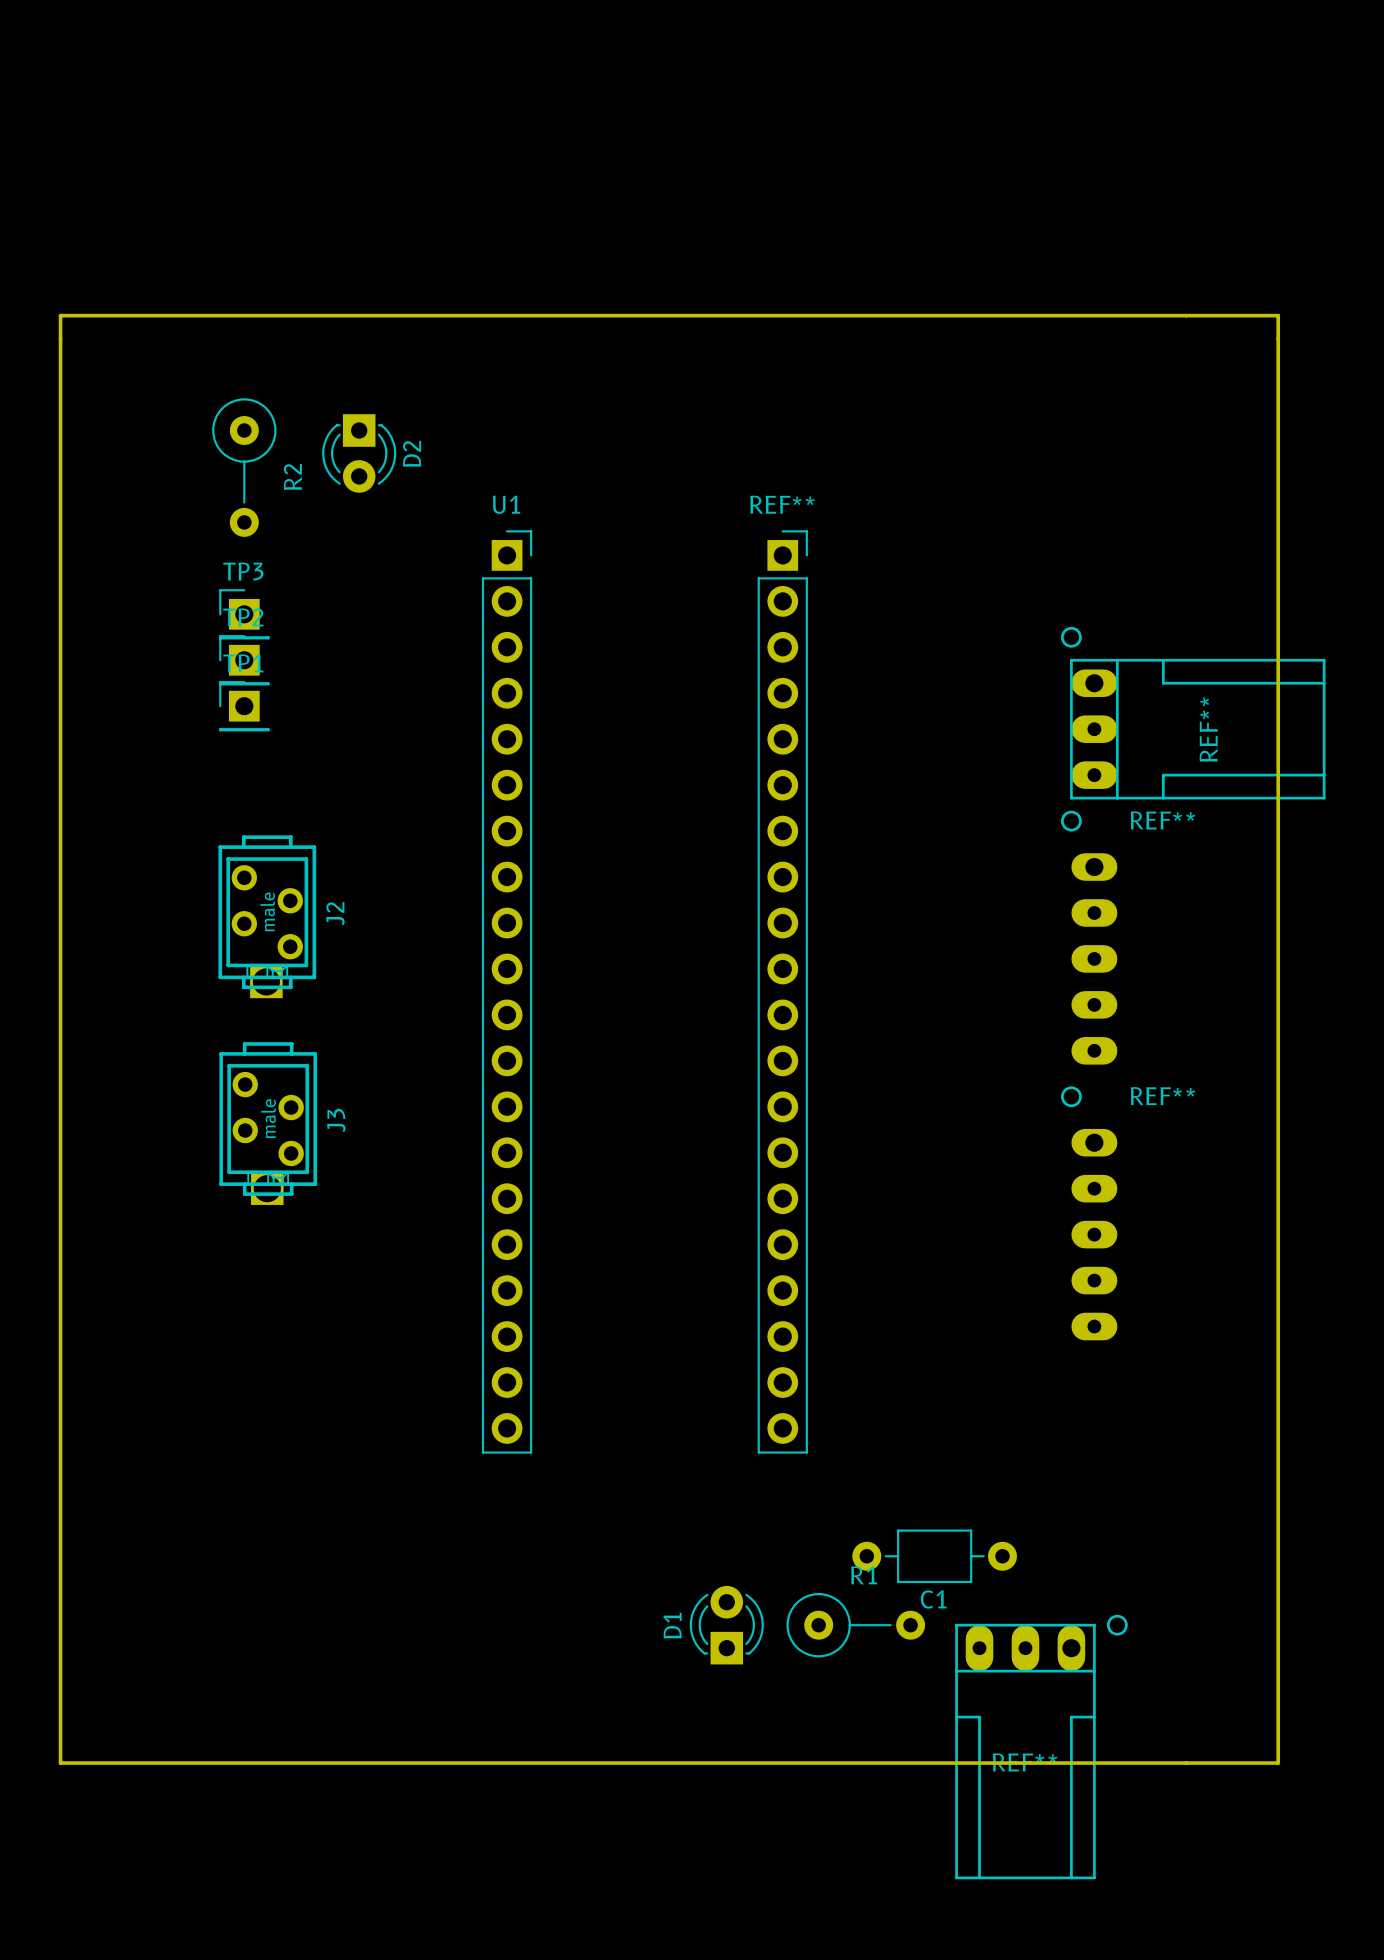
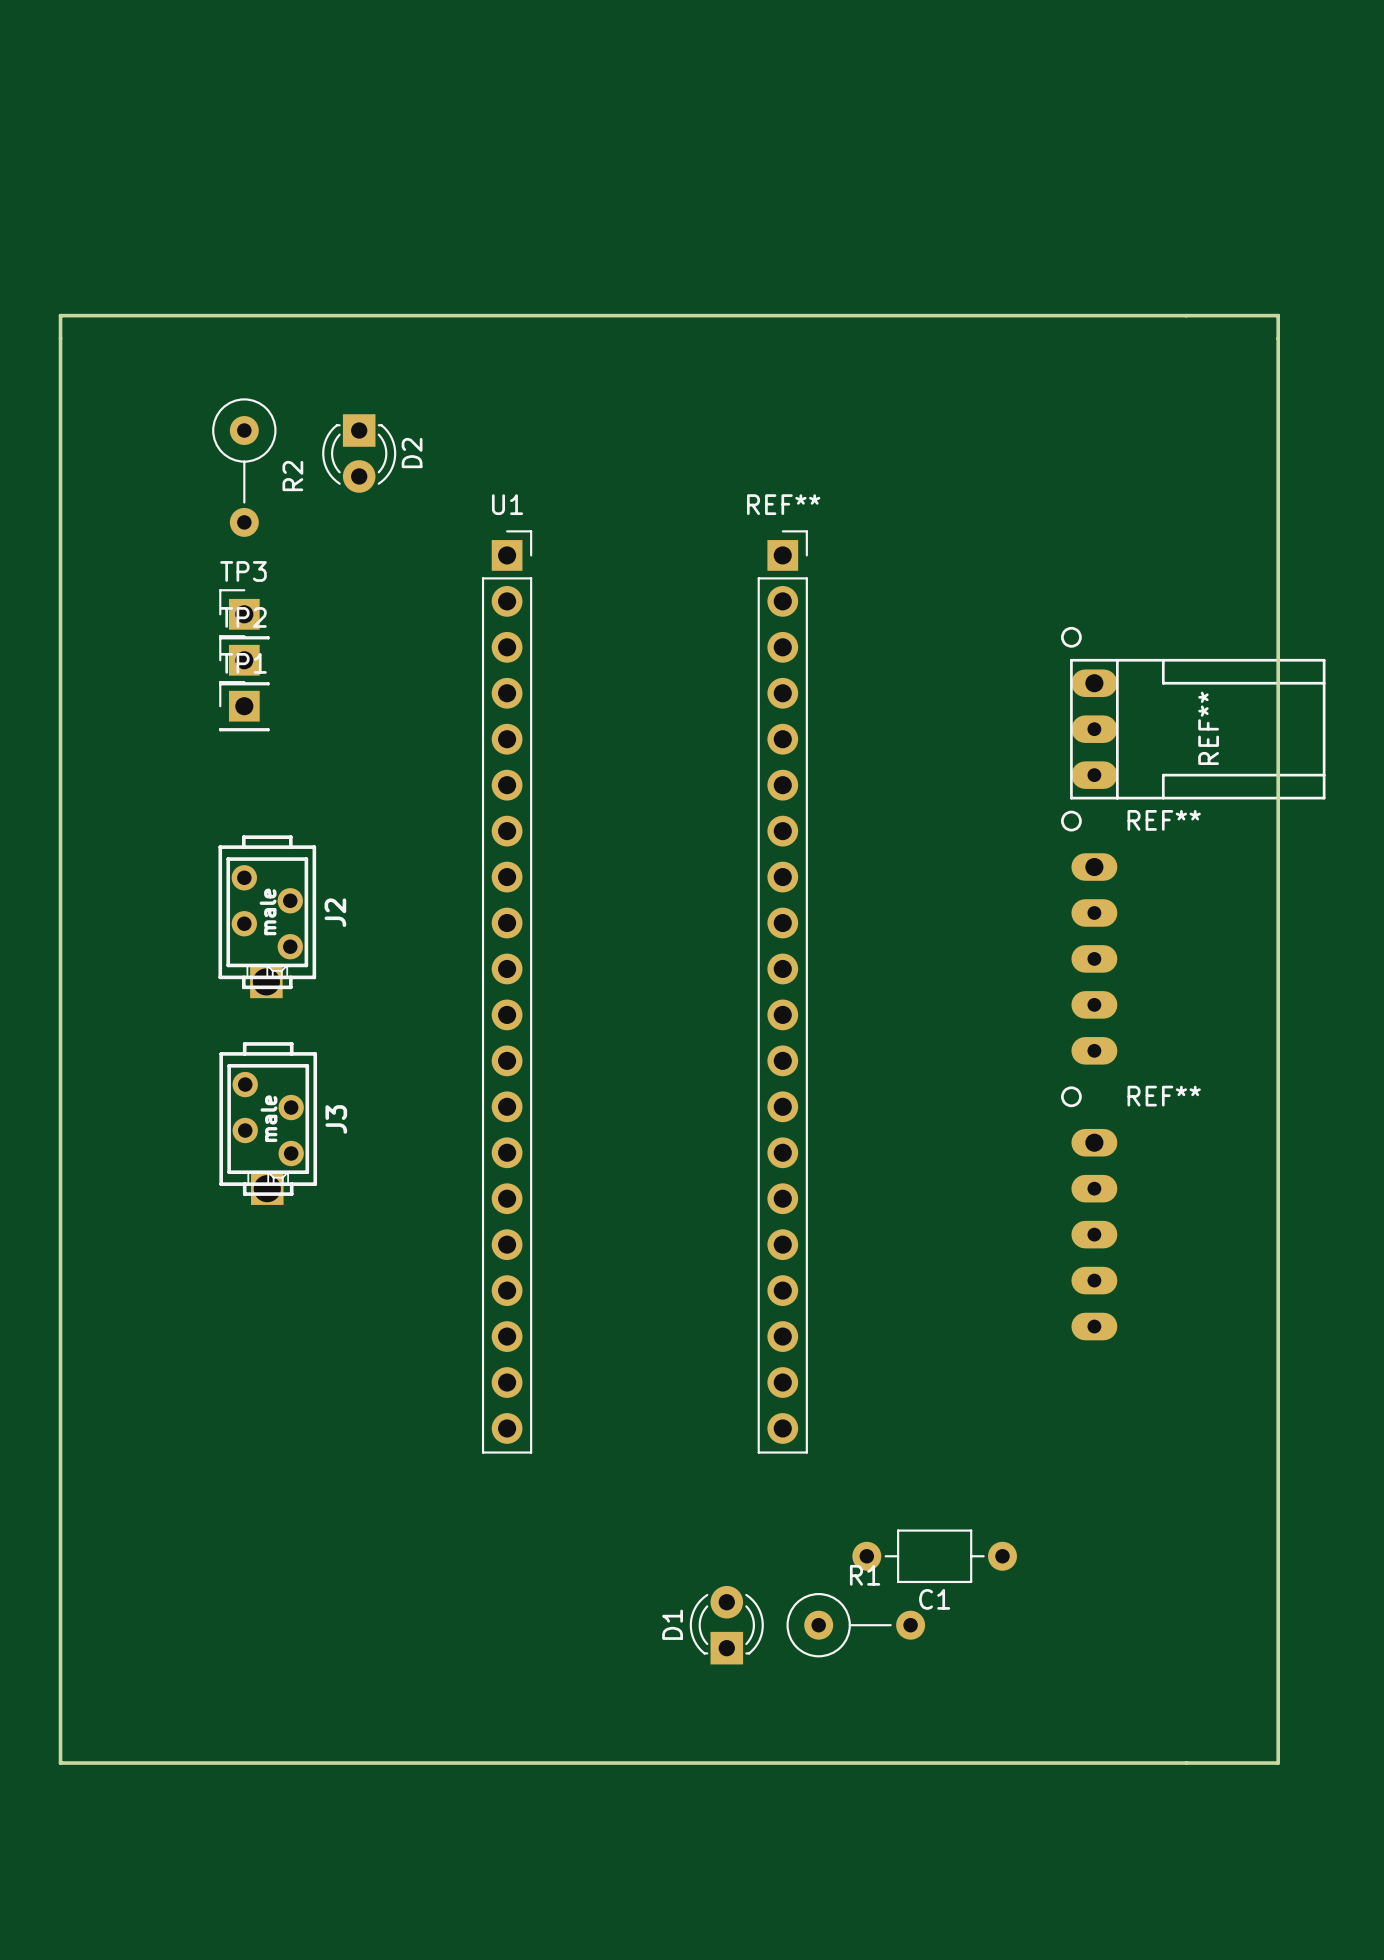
part: (1041, 1747) -> none

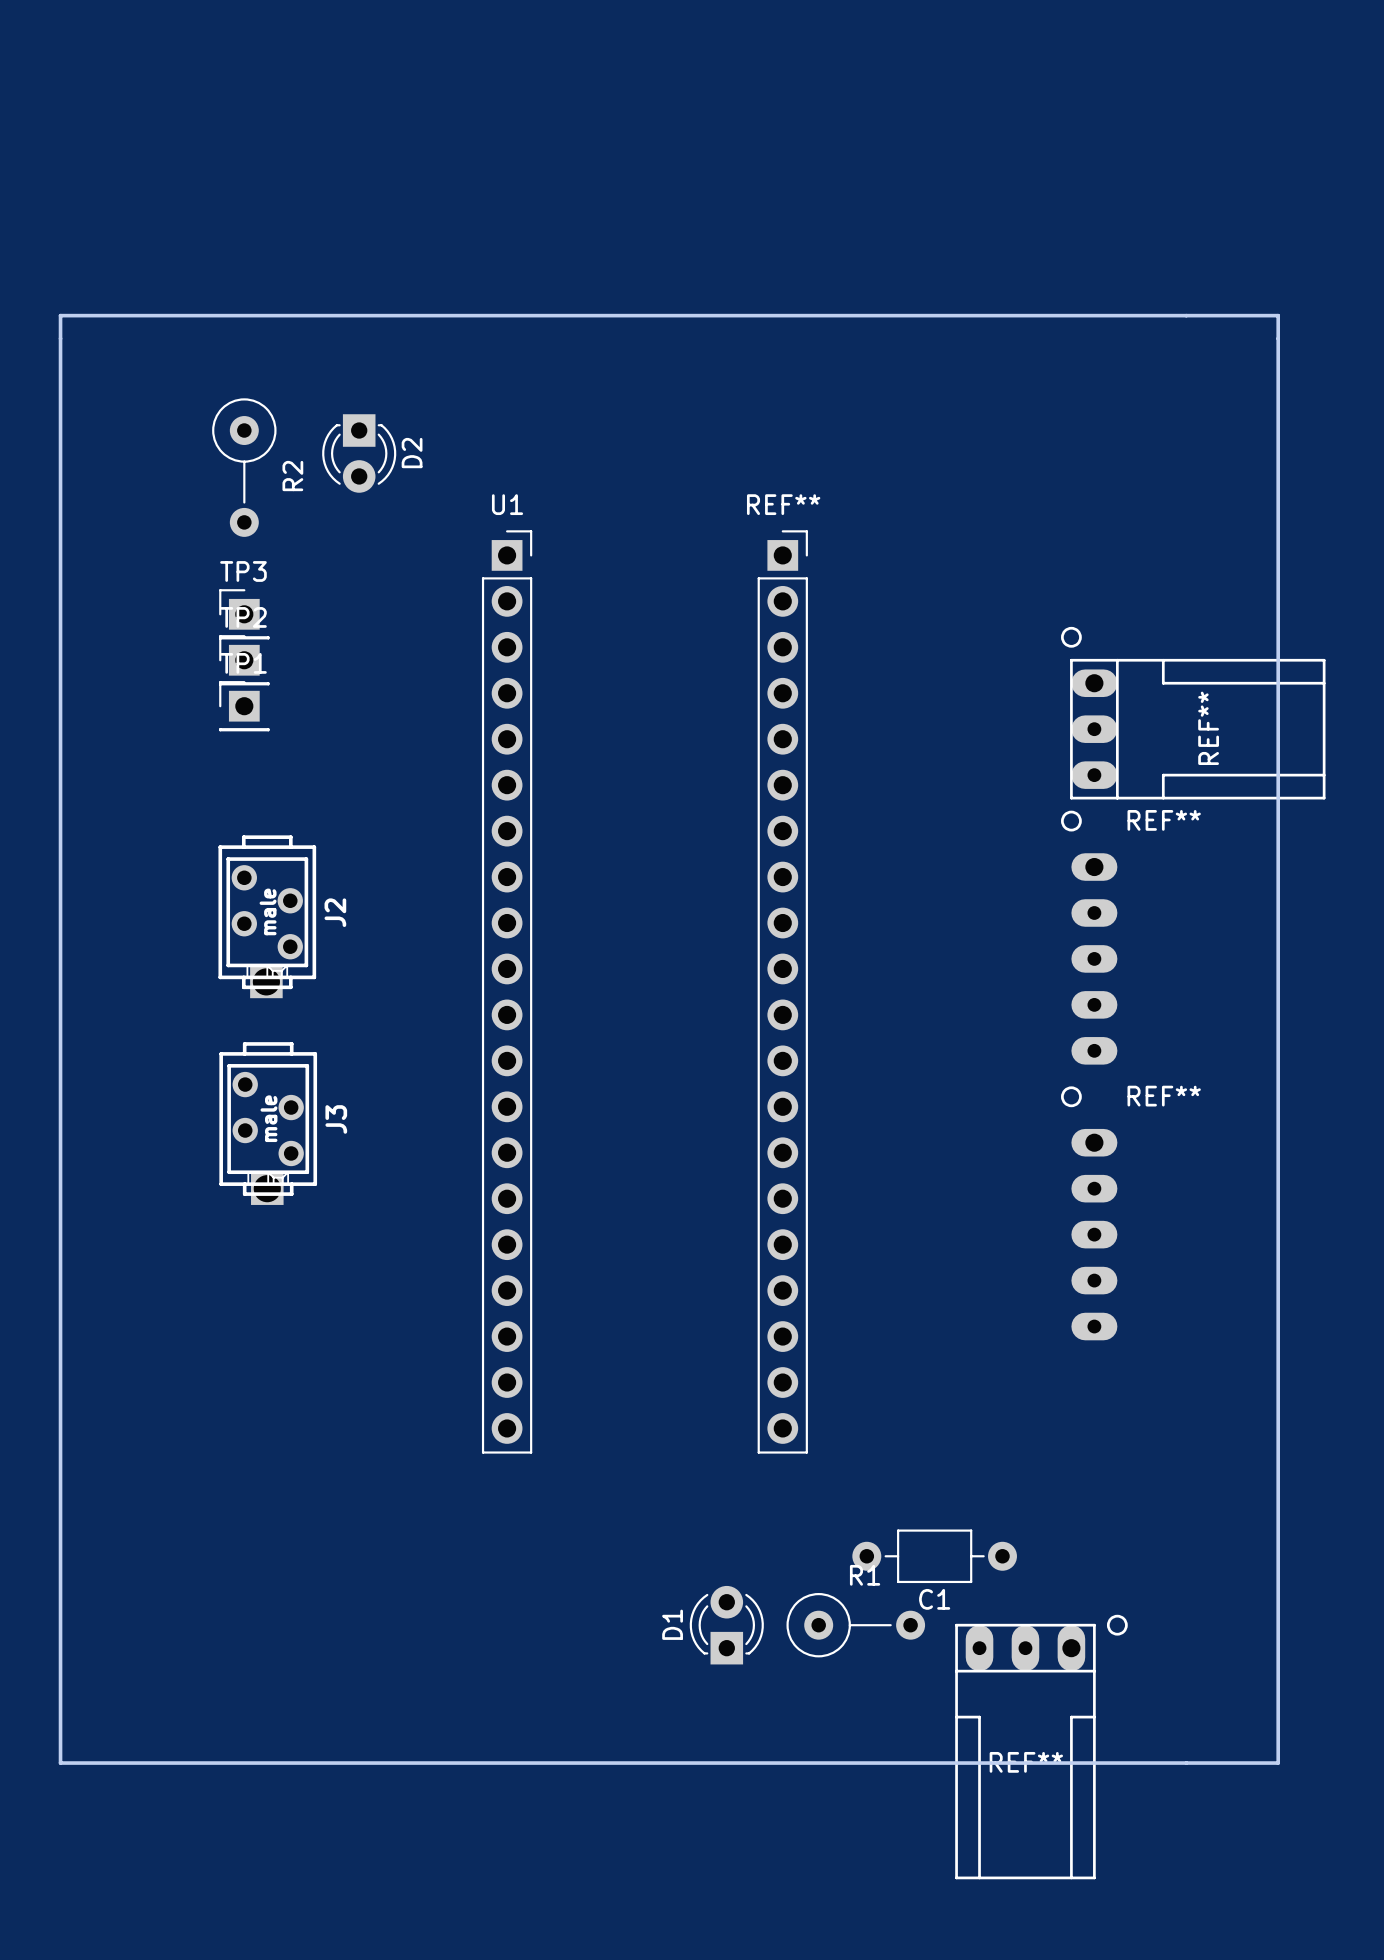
part: none -> (1041, 1747)

